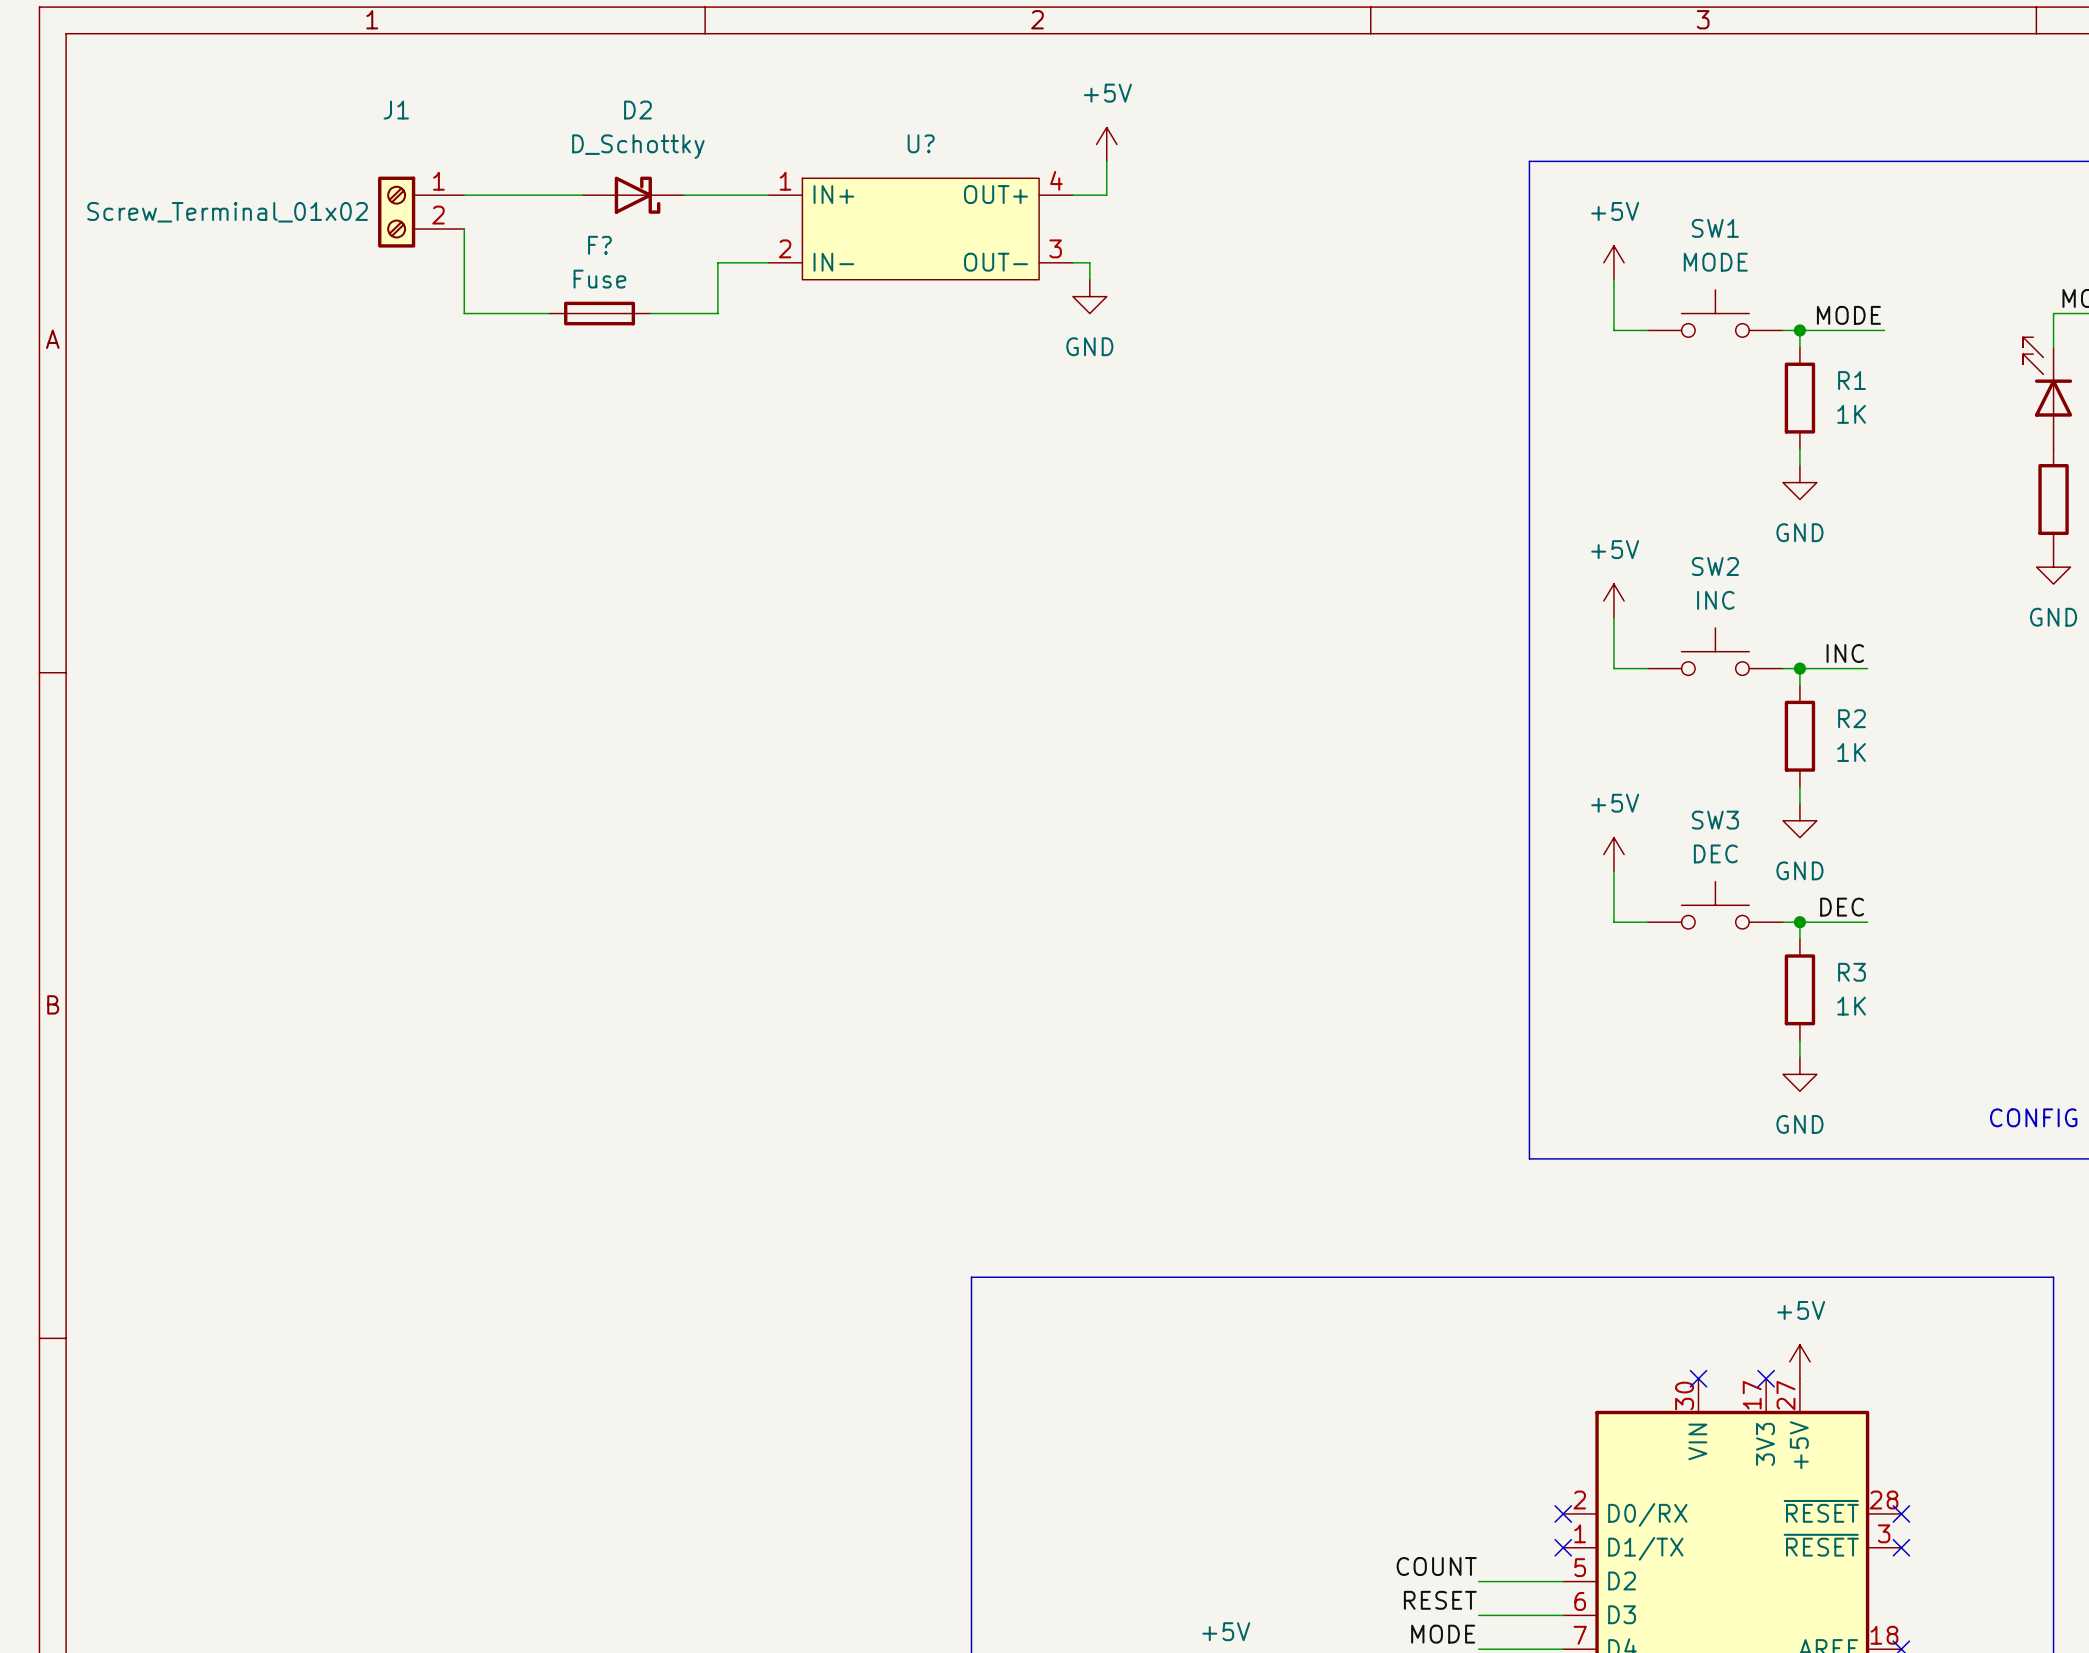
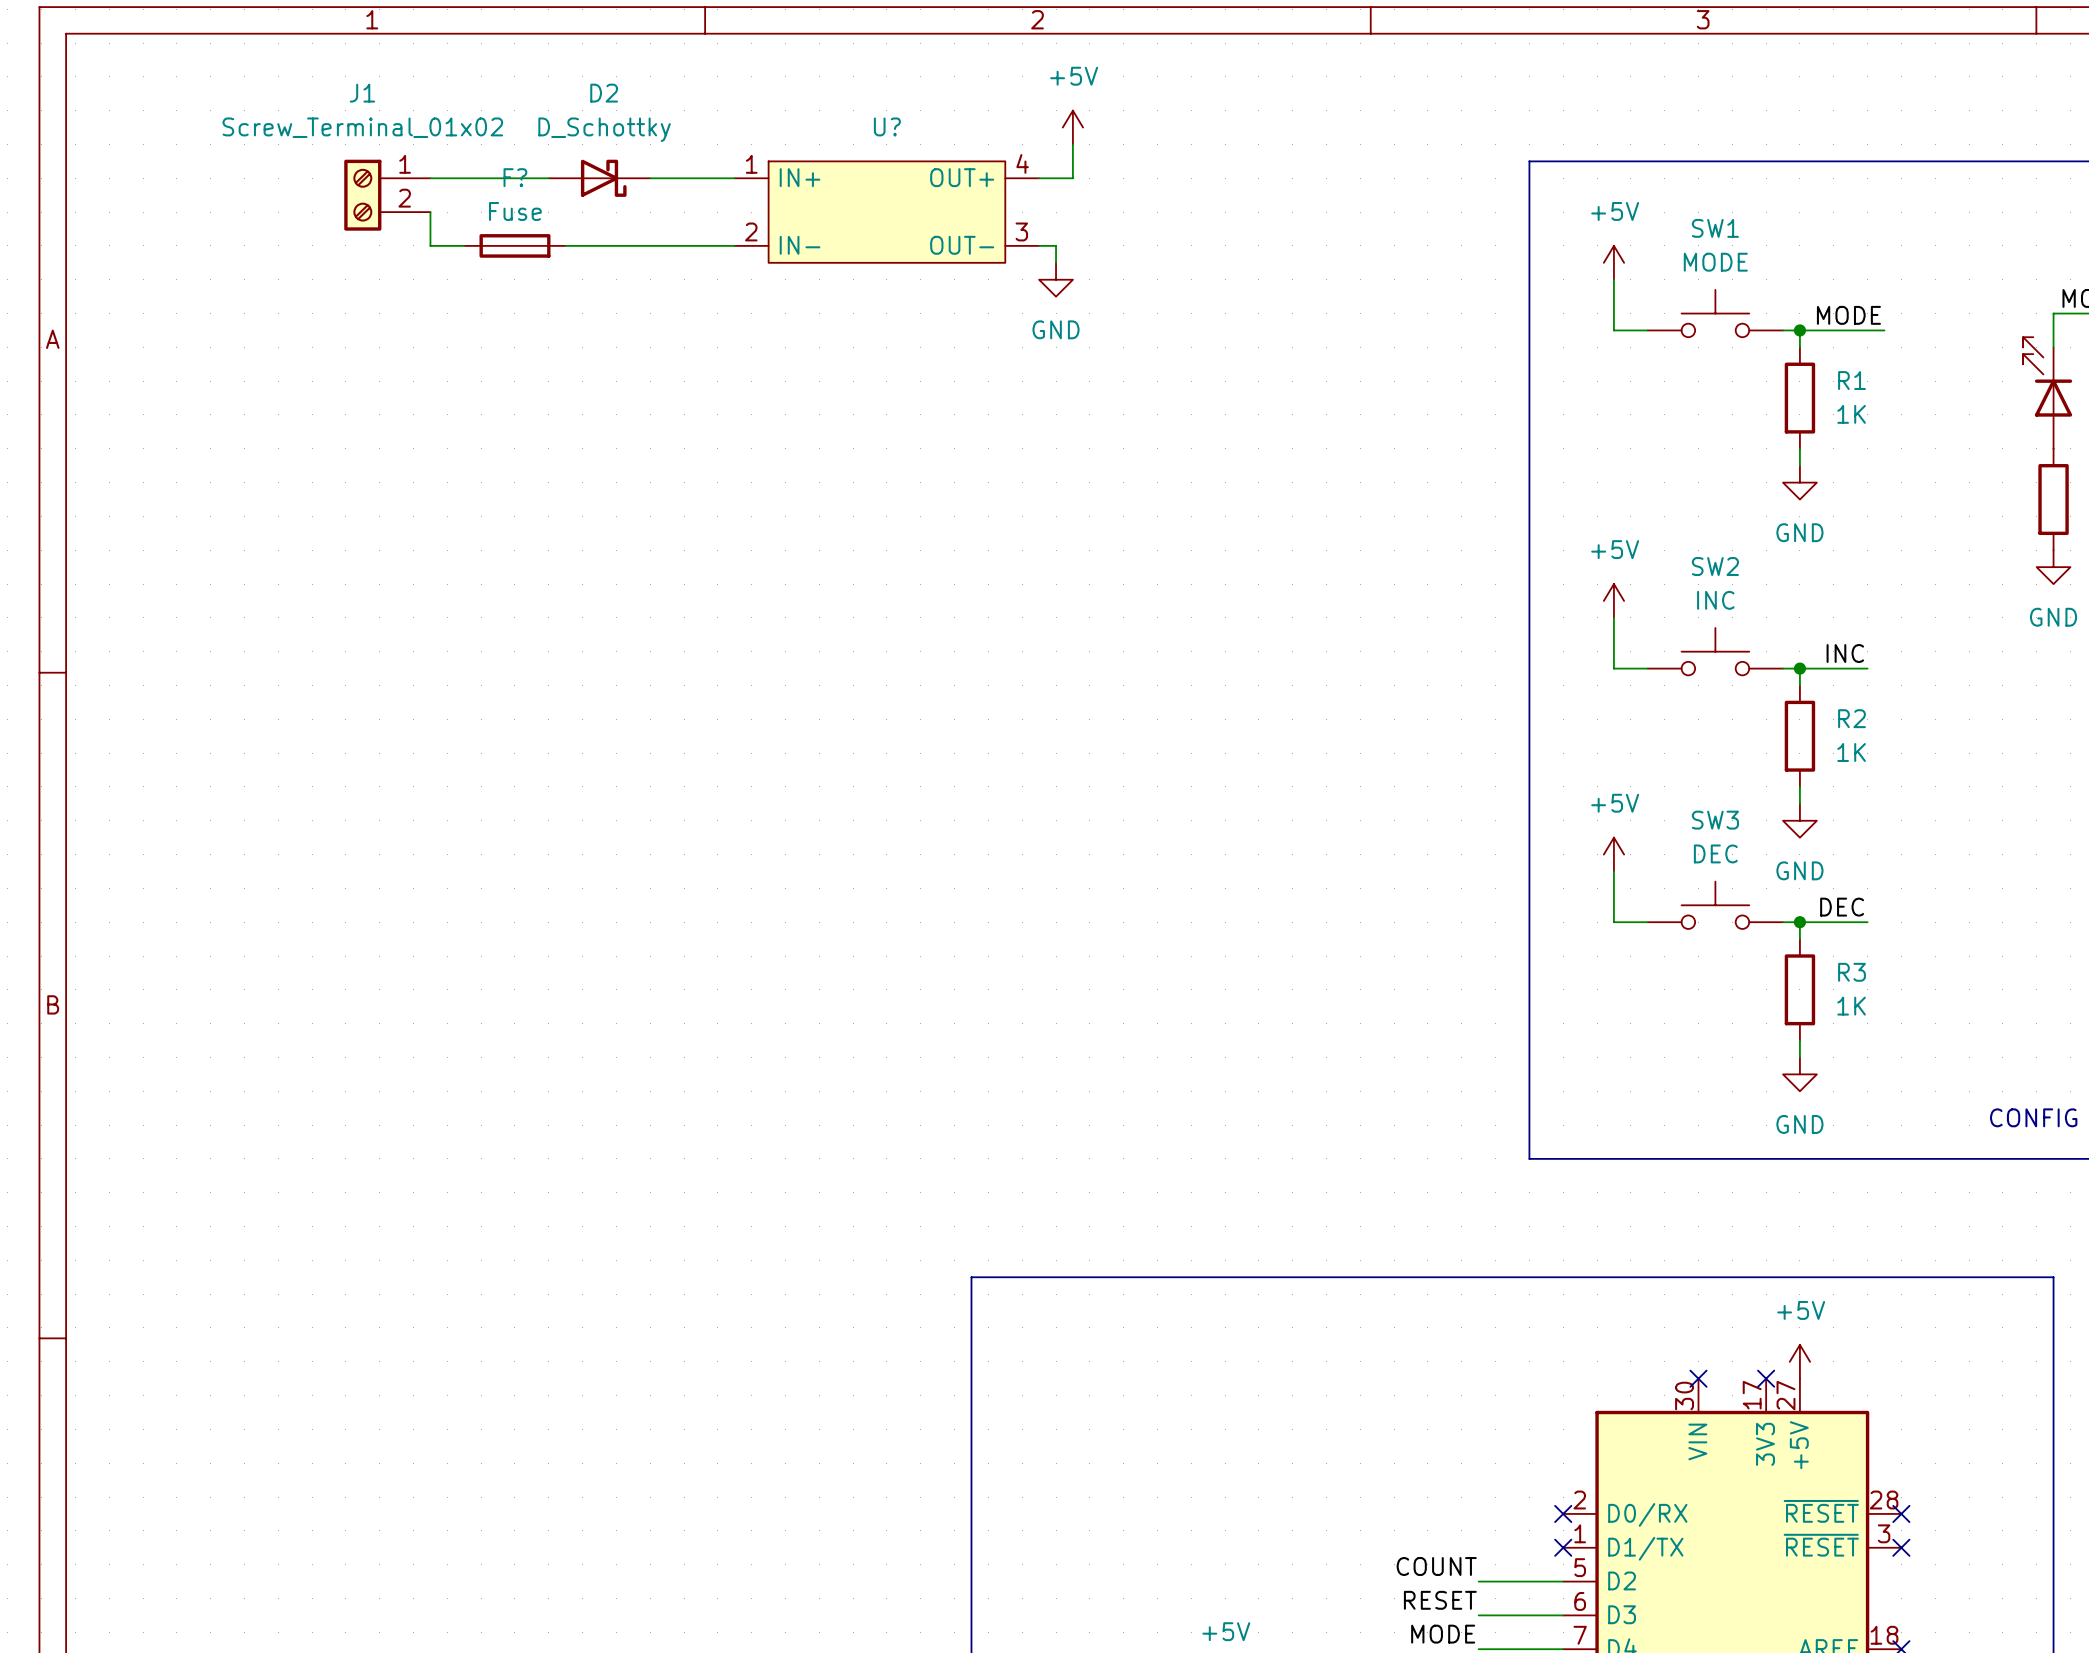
power symbol position: +5V (1106, 144) -> +5V (1072, 127)
wire: (1106, 161) (1106, 195) (1072, 195) -> (1072, 144) (1072, 178) (1039, 178)
wire: (464, 195) (582, 195) -> (430, 178) (548, 178)
D2 position: (633, 195) -> (599, 178)
wire: (684, 195) (768, 195) -> (650, 178) (734, 178)
J1 value position: Screw_Terminal_01x02 (227, 212) -> Screw_Terminal_01x02 (362, 127)
J1 position: (421, 212) -> (387, 195)
wire: none -> (430, 212) (430, 245) (464, 245)
wire: (464, 229) (464, 313) (548, 313) -> none
U? position: (920, 229) -> (886, 212)
wire: none -> (565, 245) (734, 245)
wire: (768, 262) (717, 262) (717, 313) (650, 313) -> none
wire: (1072, 262) (1089, 262) (1089, 279) -> (1039, 245) (1056, 245) (1056, 262)
power symbol position: GND (1089, 296) -> GND (1056, 279)
F? position: (599, 313) -> (514, 245)

